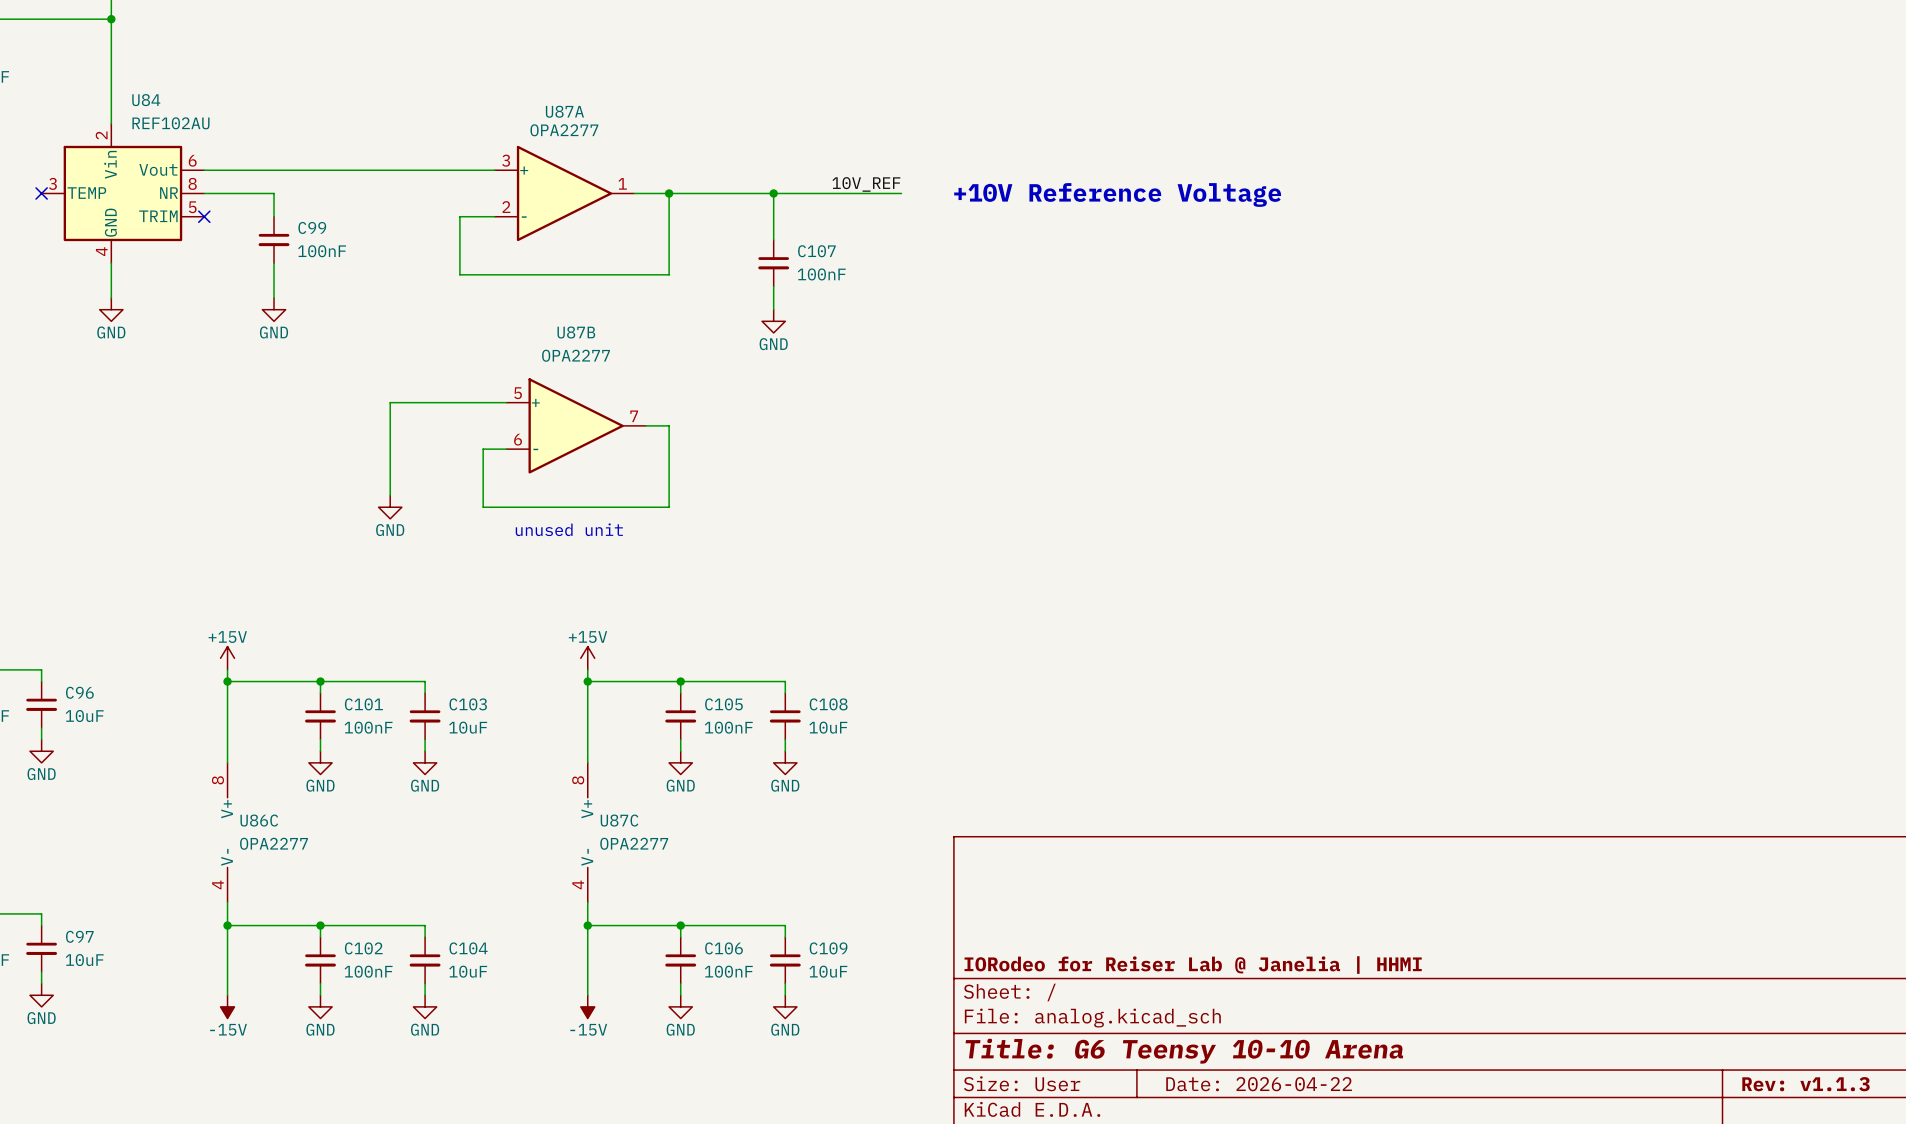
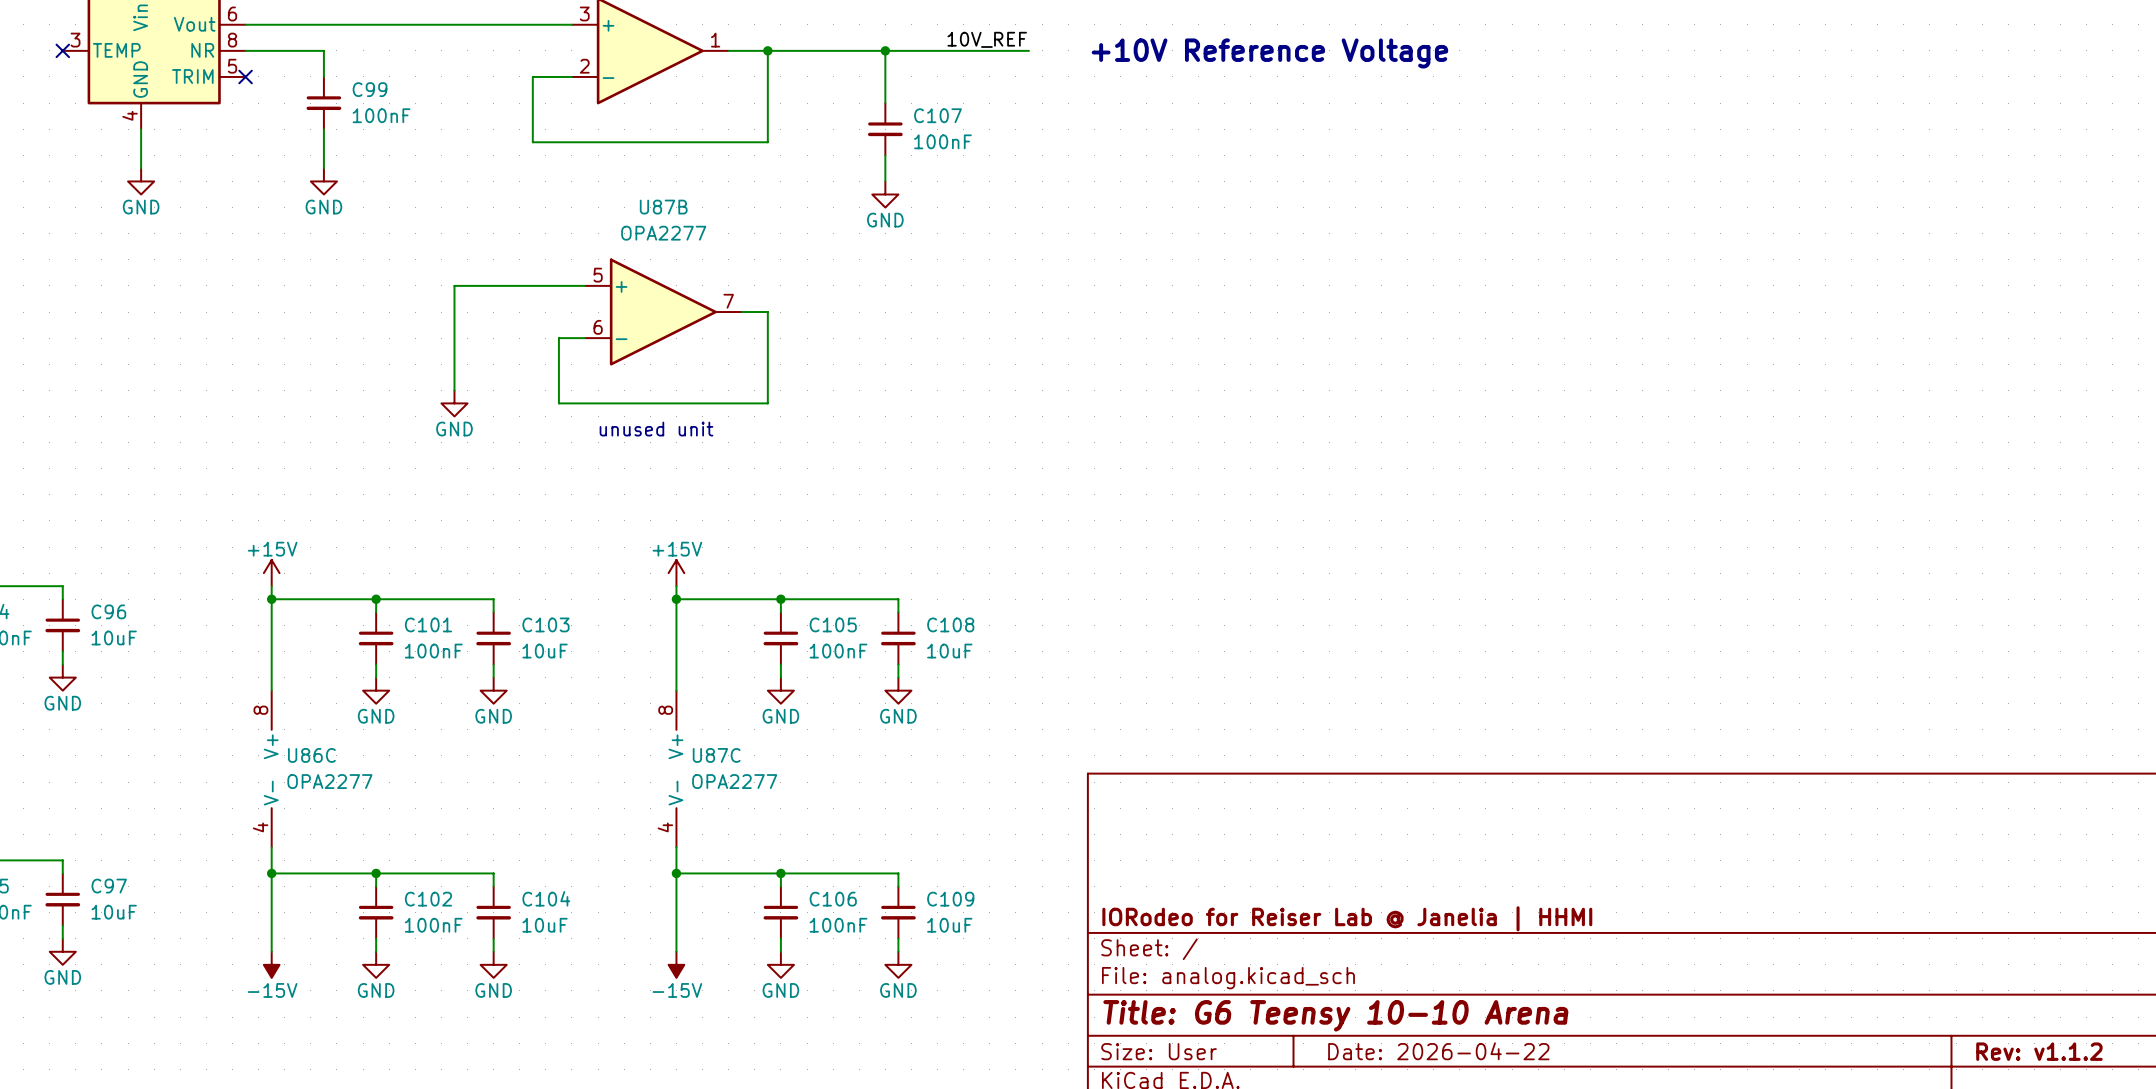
title block: Rev: v1.1.3 (1806, 1084) -> Rev: v1.1.2 (2039, 1051)

